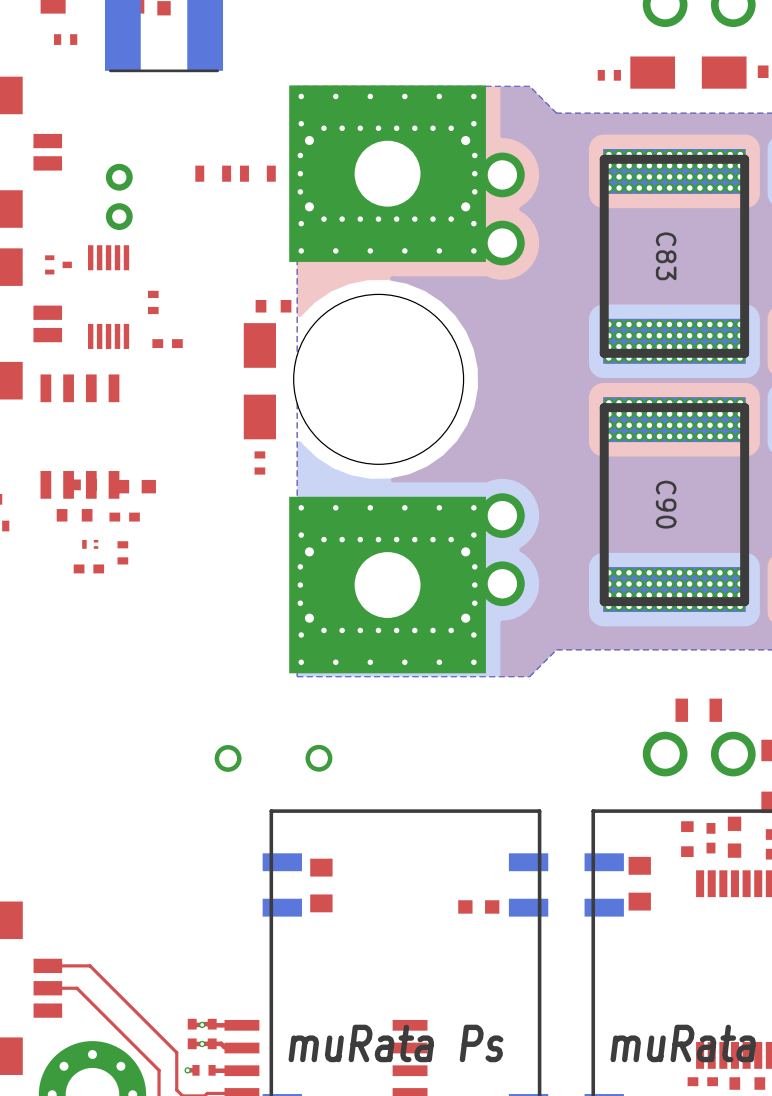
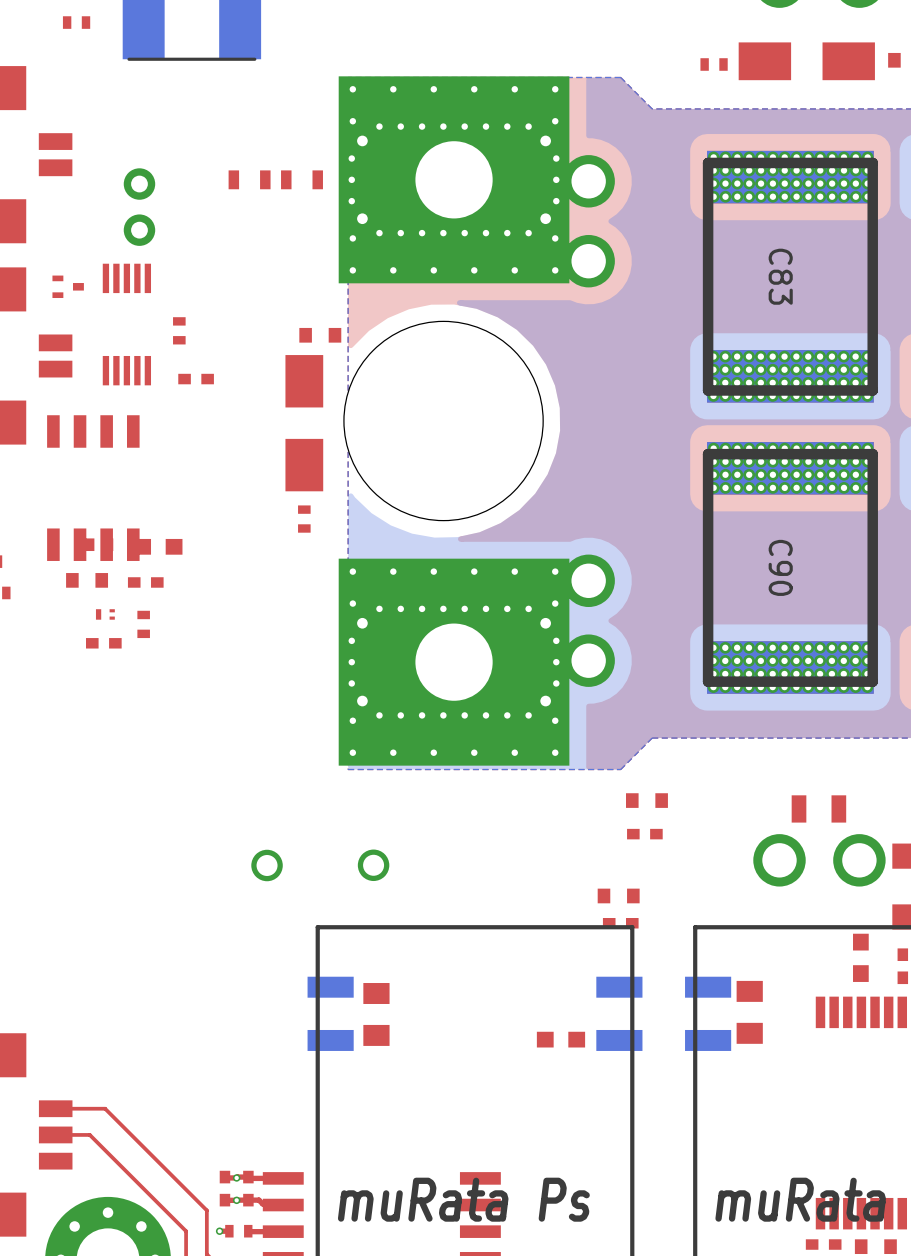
part: none -> (646, 800)
part: none -> (644, 834)
part: none -> (618, 895)
part: none -> (620, 923)
part: (710, 838) -> none
part: (687, 839) -> none

